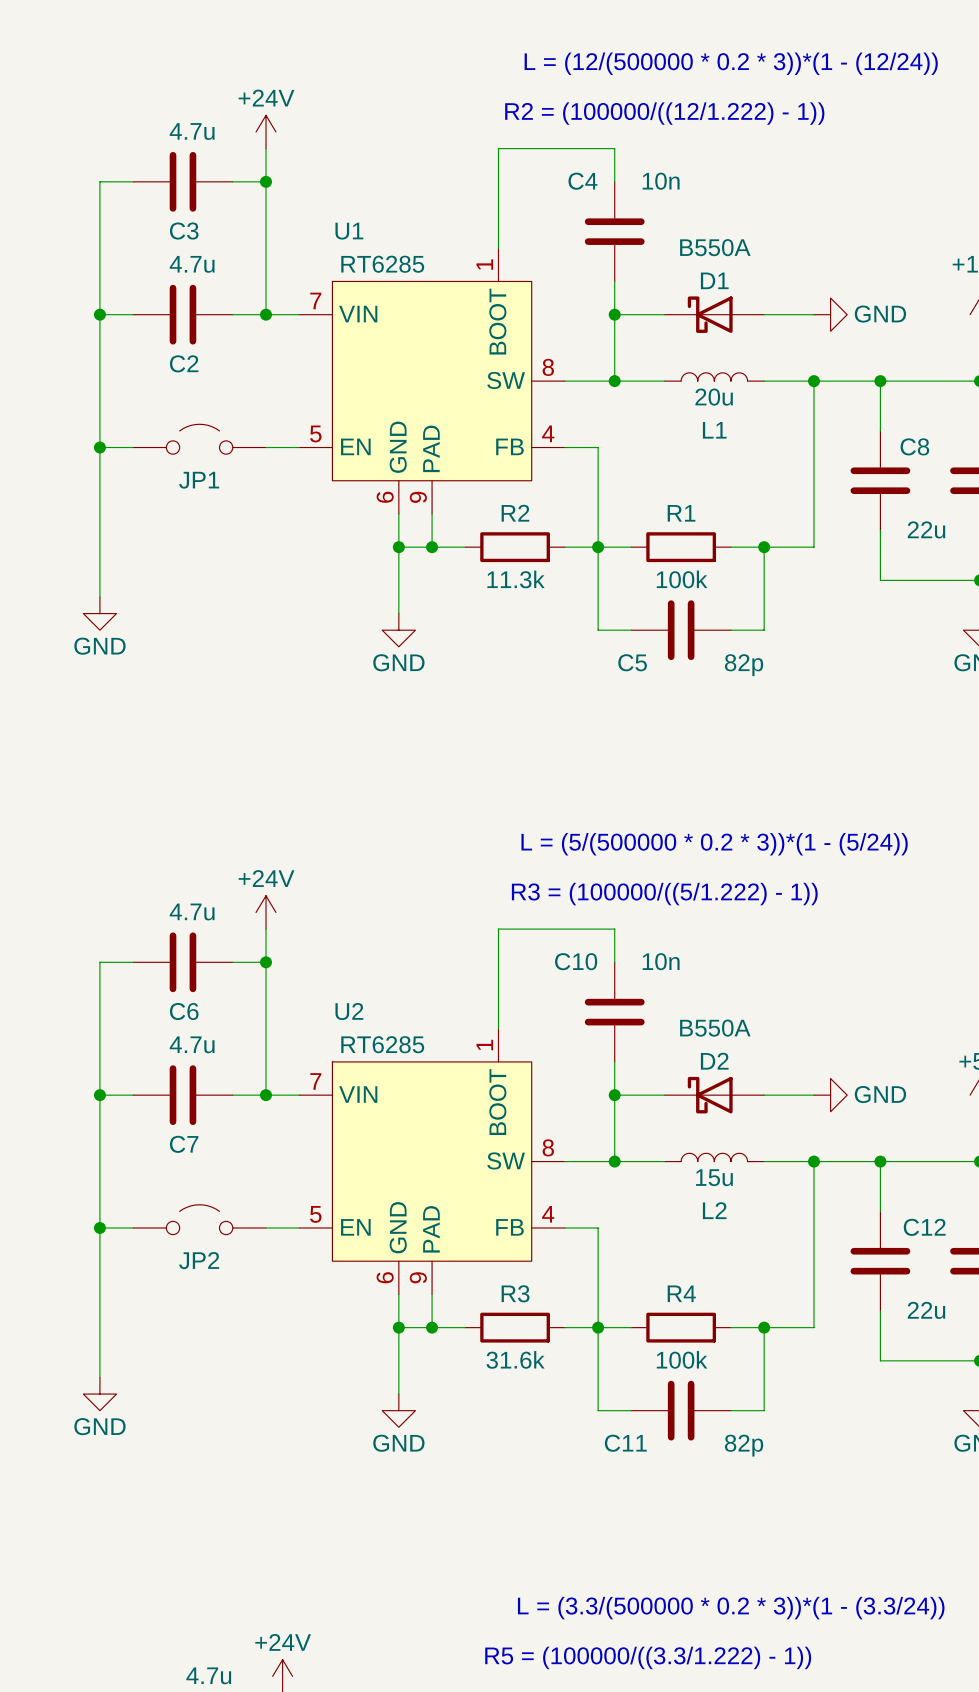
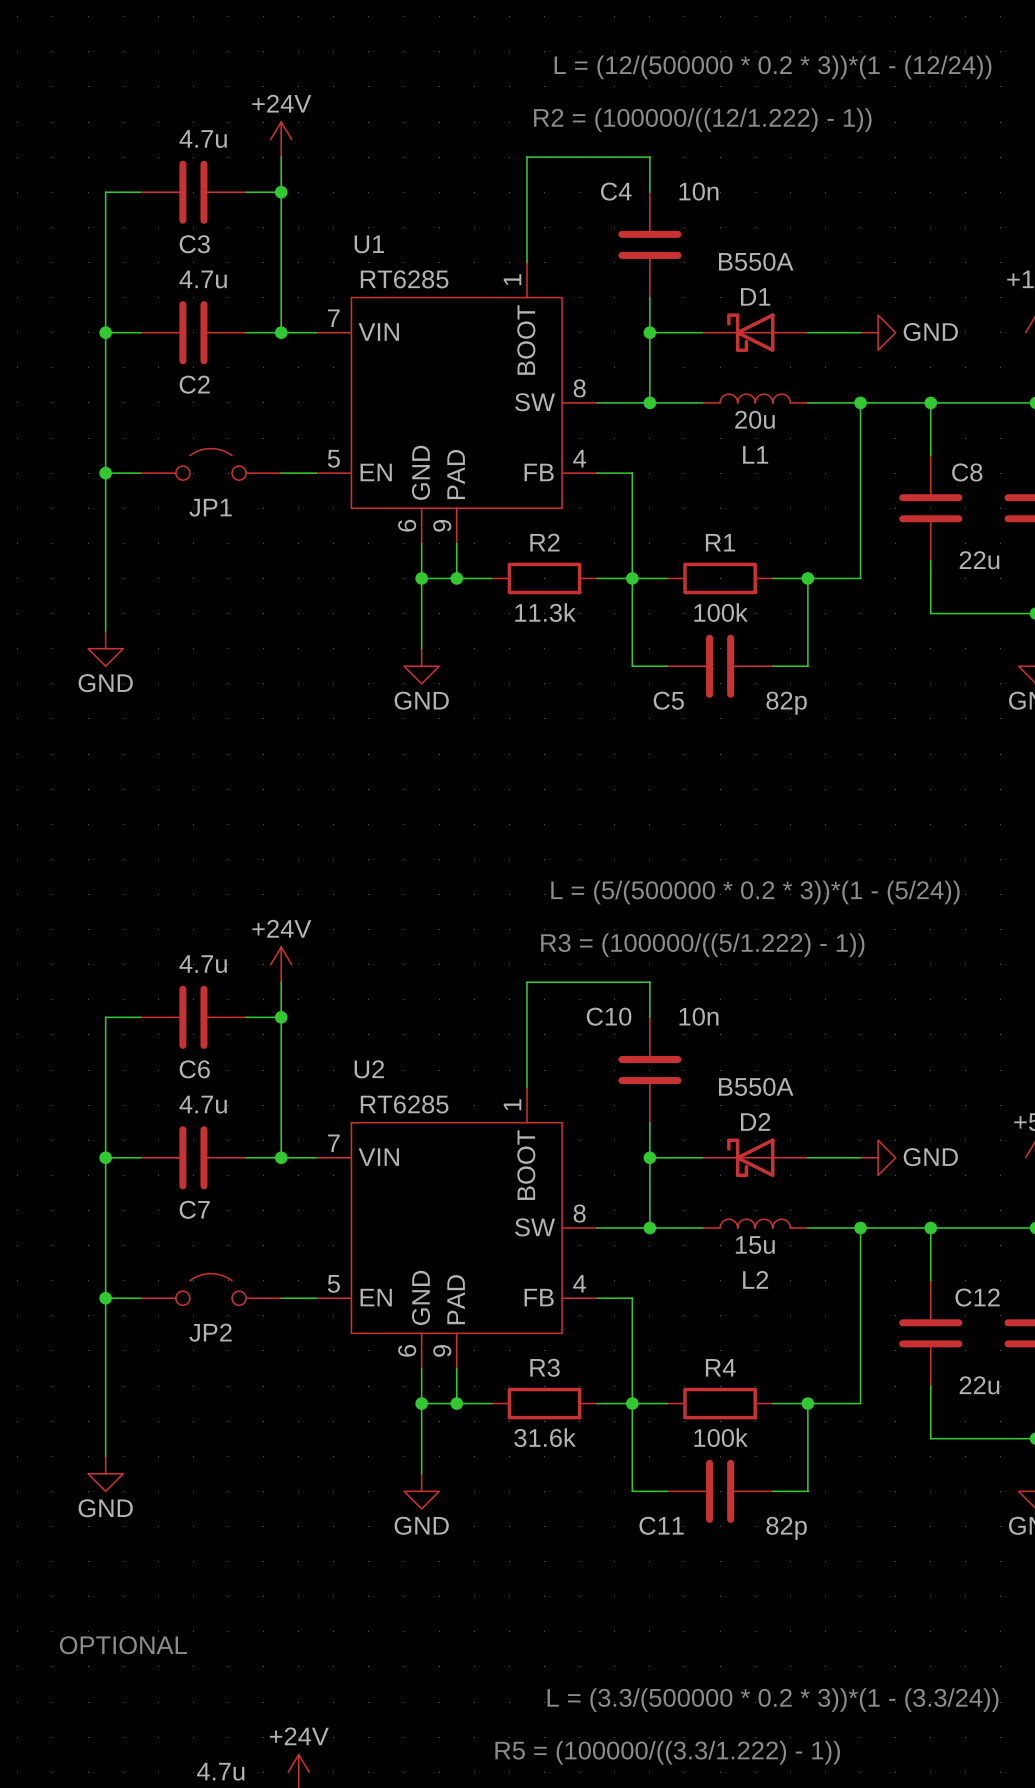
text: none -> OPTIONAL (123, 1645)
text position: R5 = (100000/((3.3/1.222) - 1)) (648, 1657) -> R5 = (100000/((3.3/1.222) - 1)) (667, 1752)

